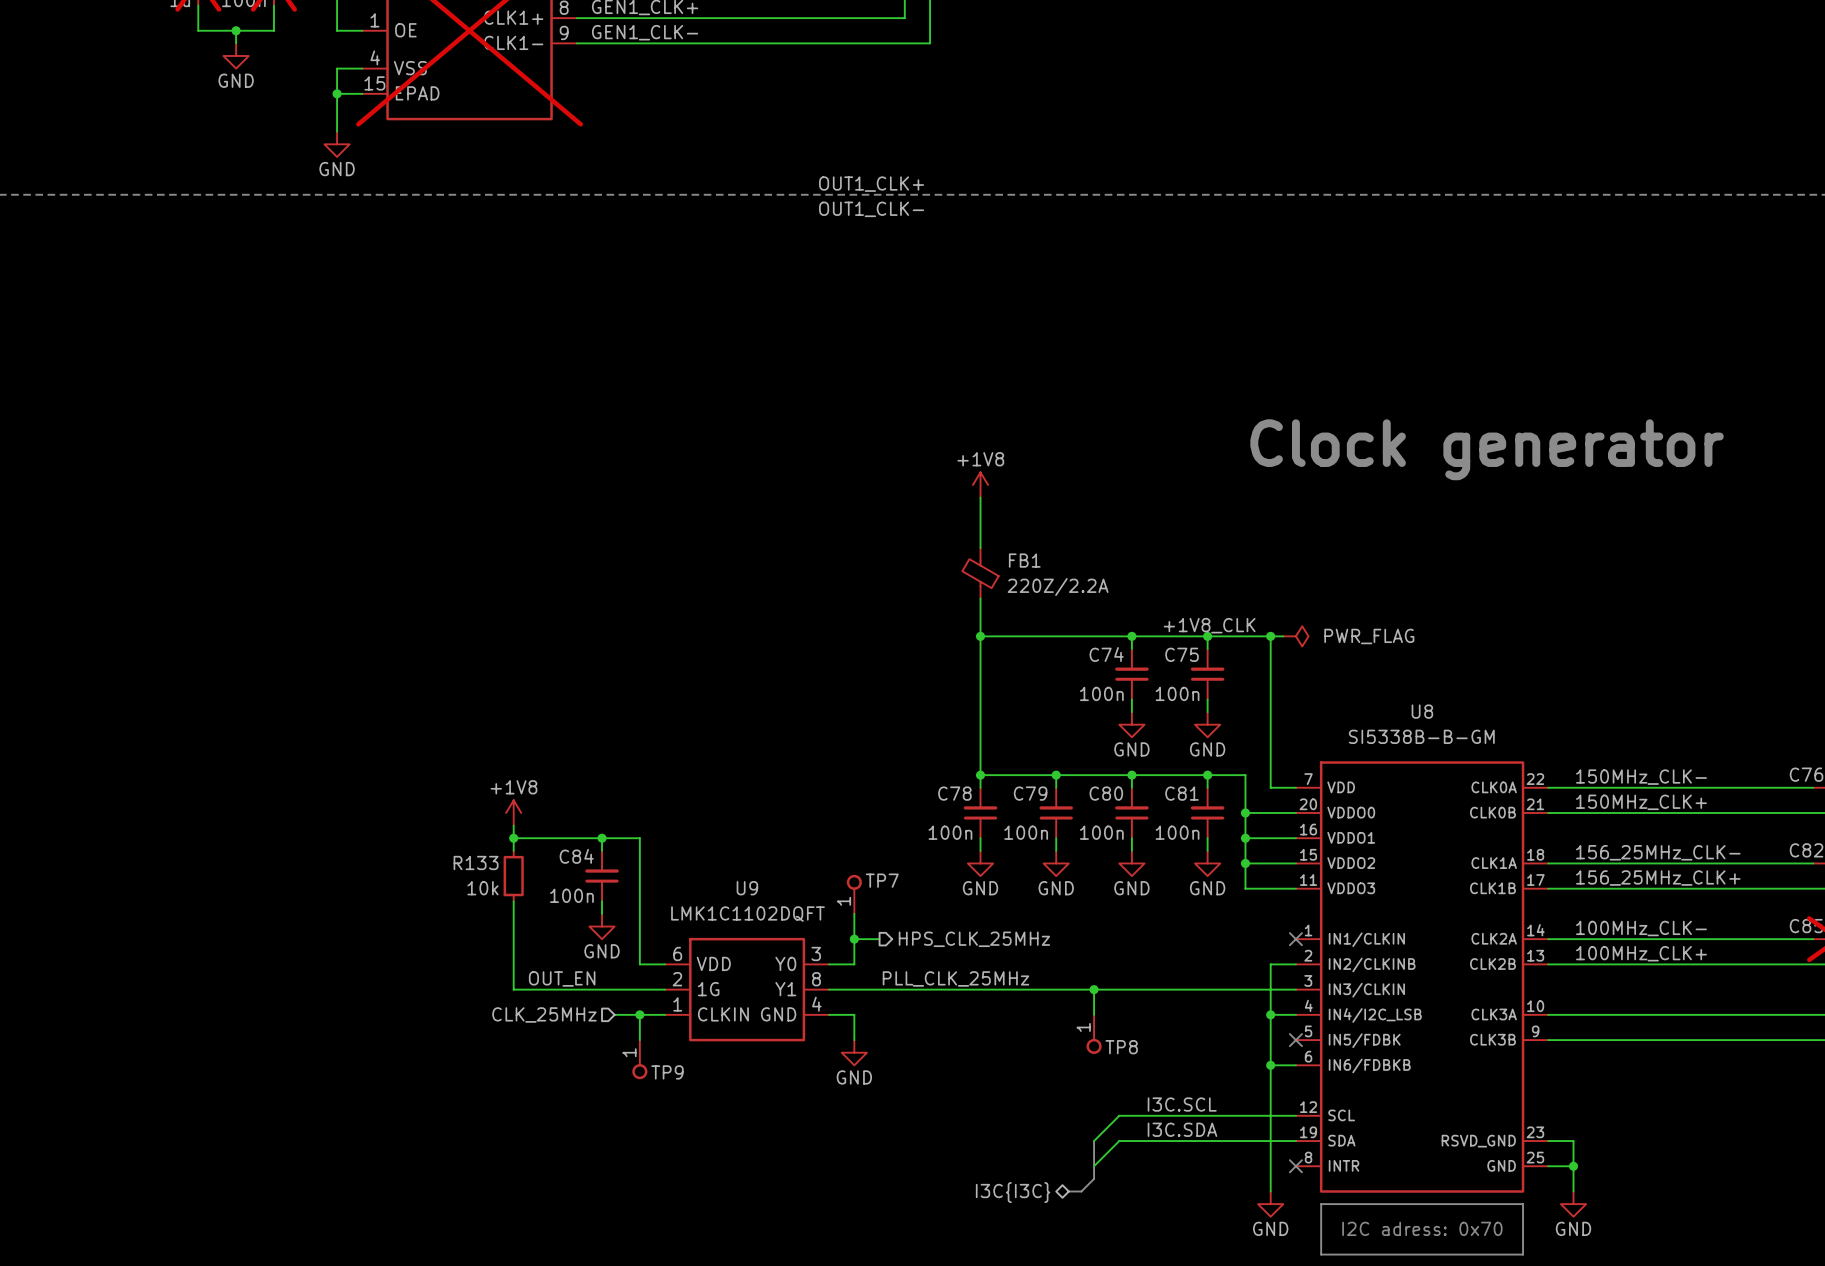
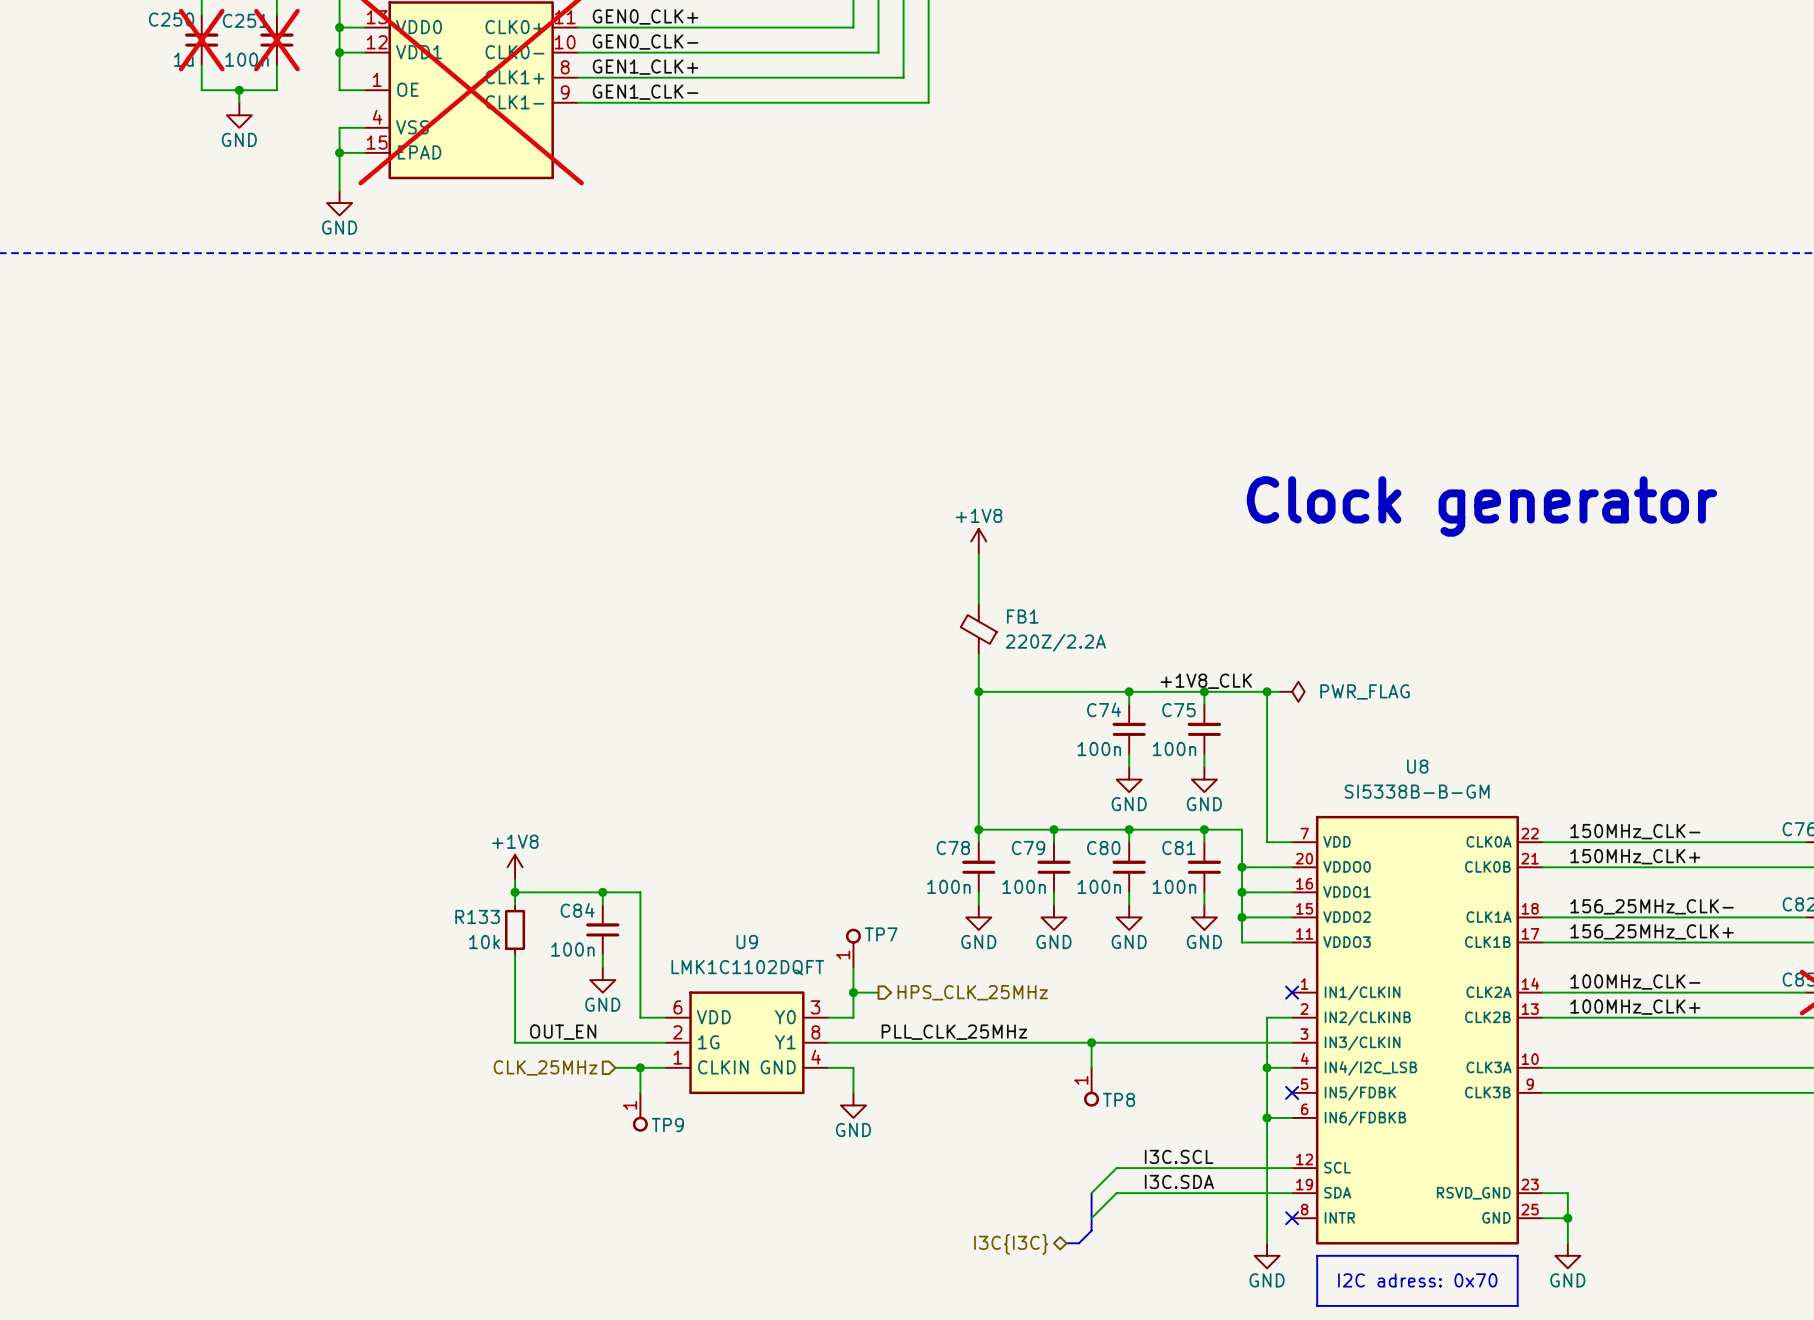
label: OUT1_CLK+ (871, 184) -> none
label: OUT1_CLK- (871, 209) -> none

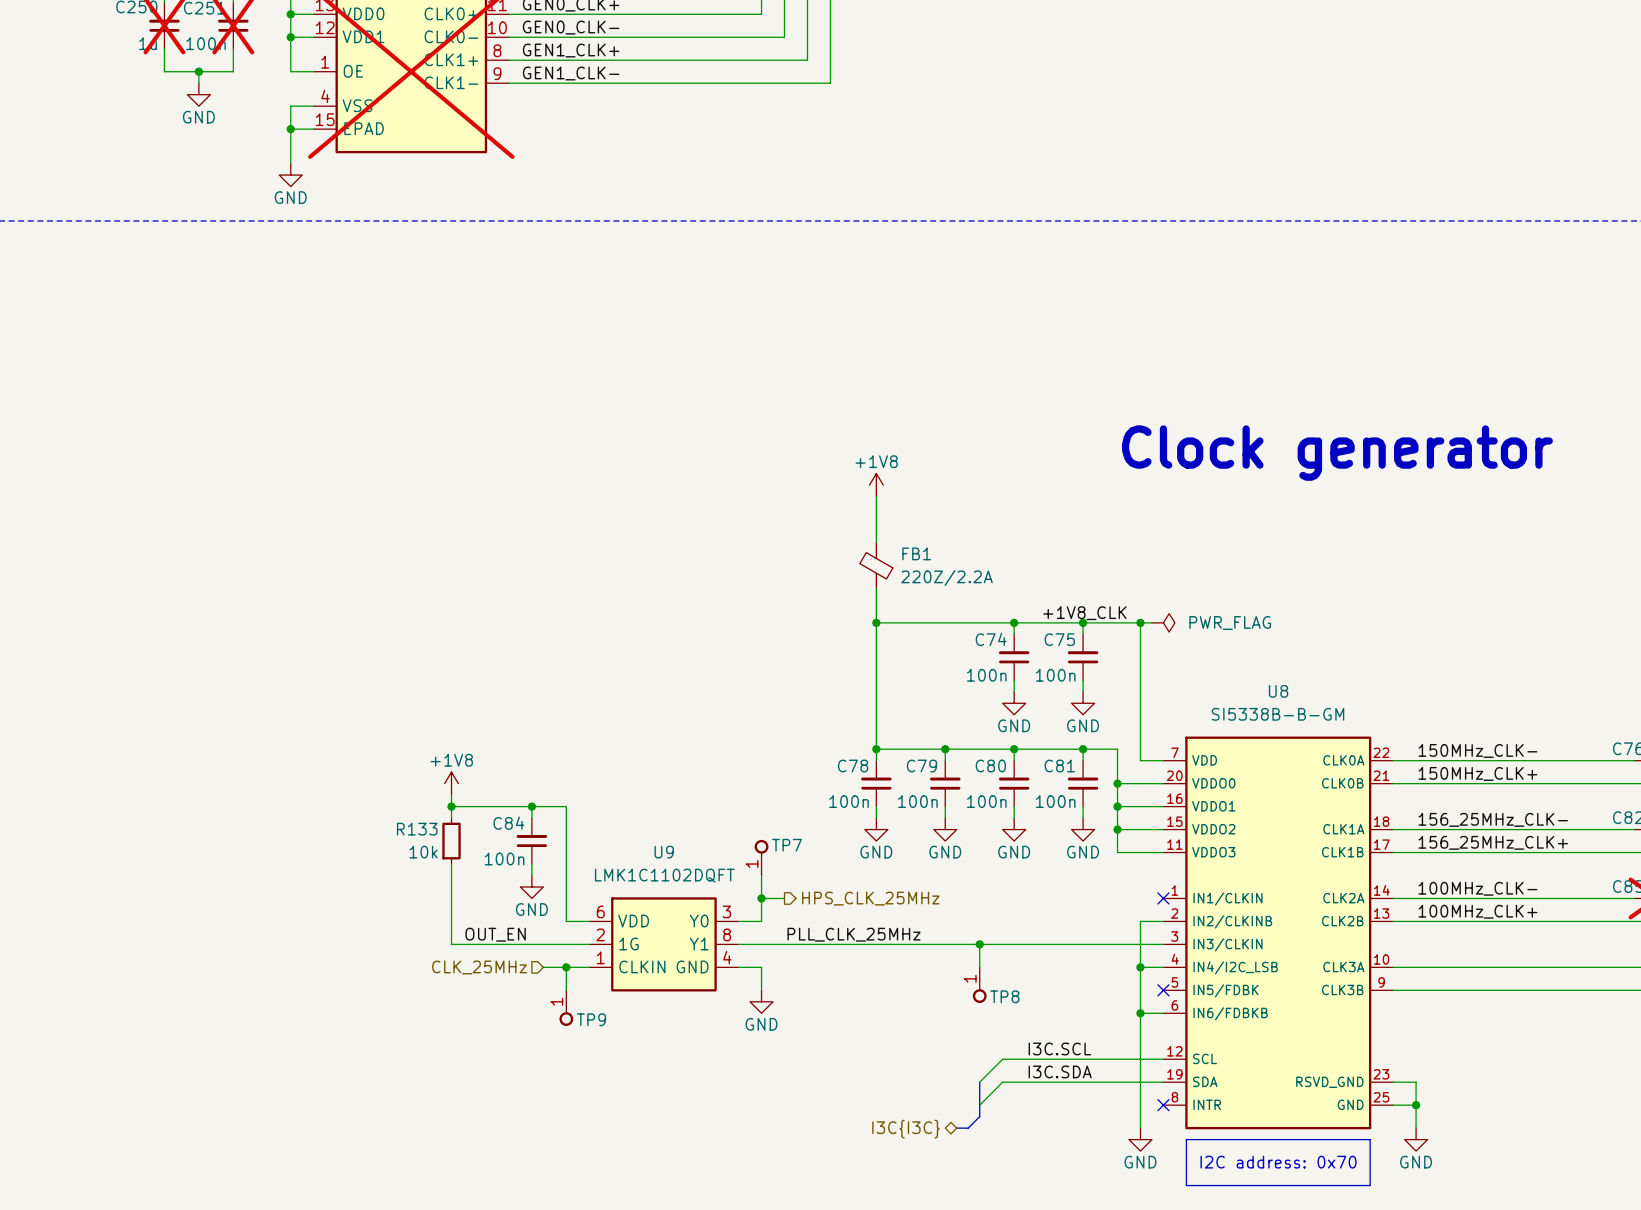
text: I2C adress: 0x70 (1417, 1280) -> I2C address: 0x70 (1278, 1162)

